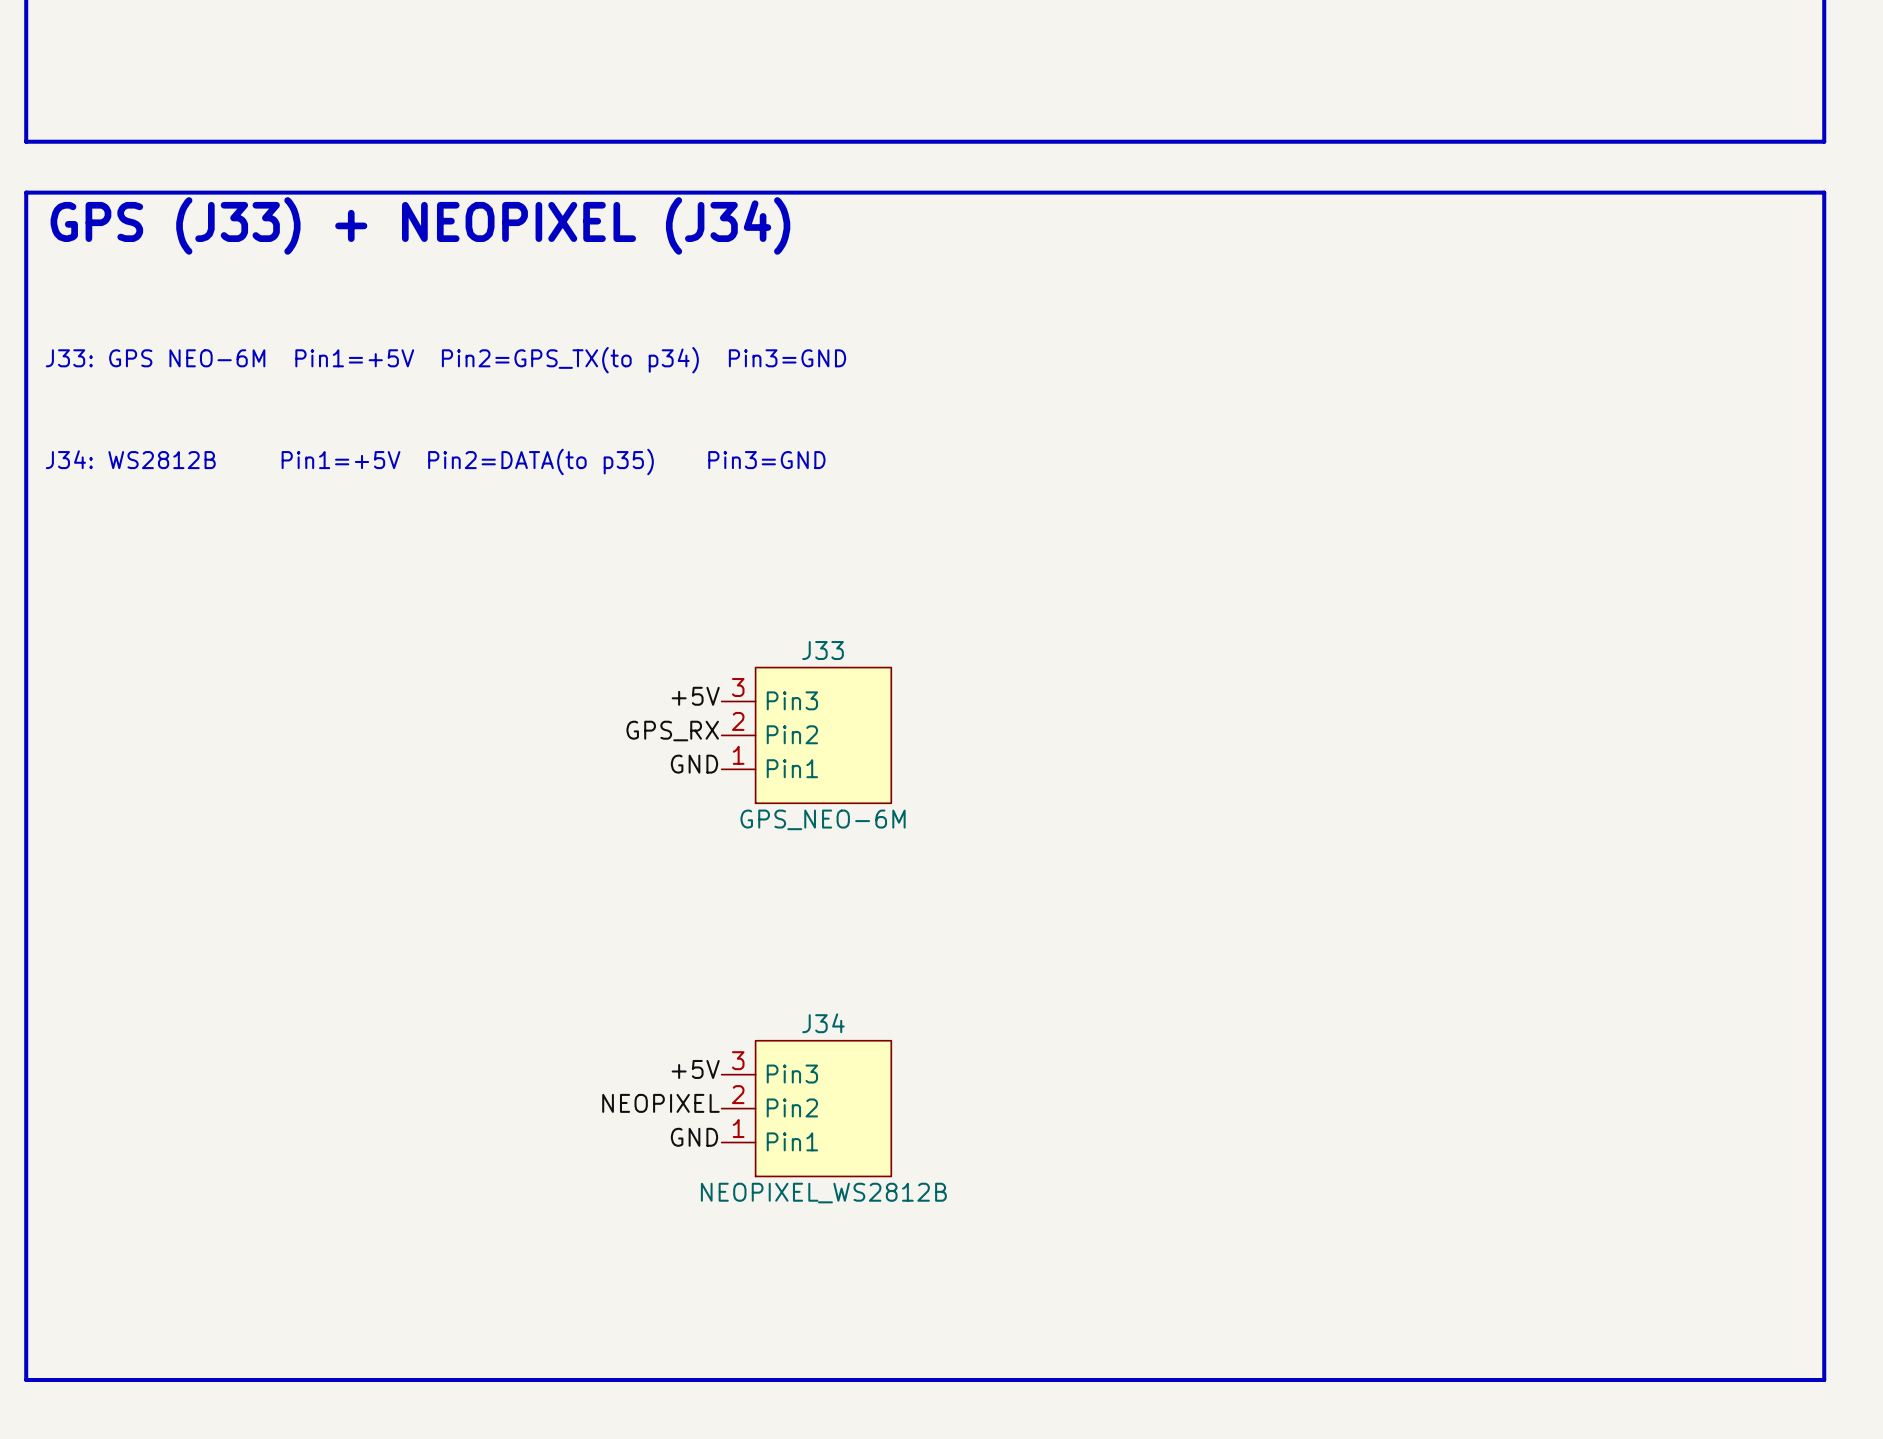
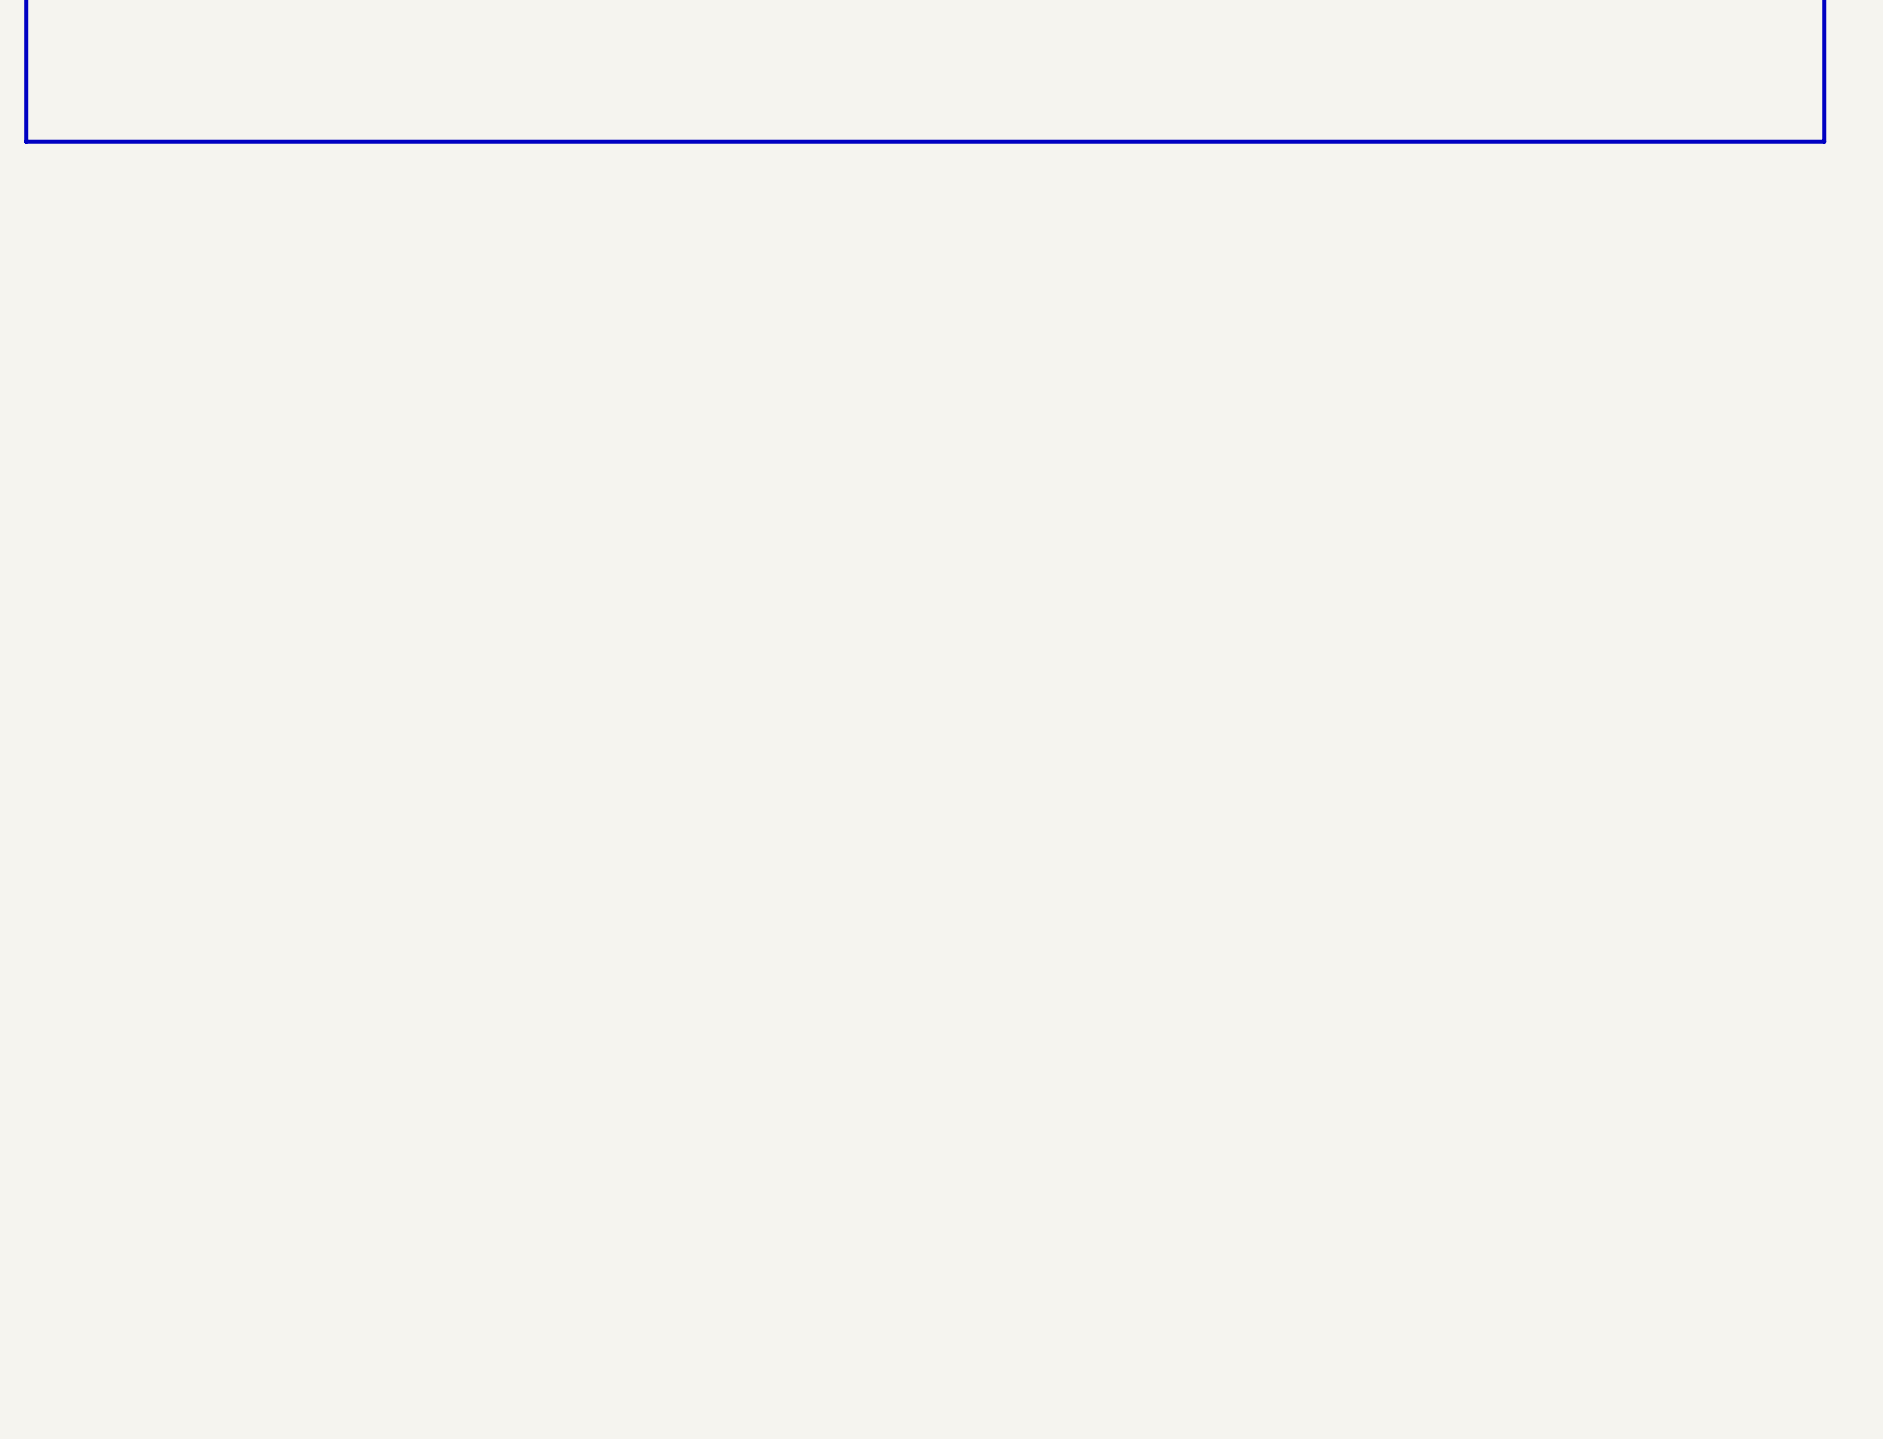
line: (26, 192) (1824, 192) (1824, 1379) (26, 1379) (26, 192) -> none
text: GPS (J33) + NEOPIXEL (J34) (420, 225) -> none
text: J33: GPS NEO-6M Pin1=+5V Pin2=GPS_TX(to p34) Pin3=GND (445, 360) -> none
text: J34: WS2812B Pin1=+5V Pin2=DATA(to p35) Pin3=GND (435, 461) -> none
label: +5V (695, 696) -> none
label: GPS_RX (672, 731) -> none
J33: GPS_NEO-6M (806, 735) -> none
label: GND (694, 764) -> none
label: +5V (695, 1069) -> none
label: NEOPIXEL (660, 1103) -> none
J34: NEOPIXEL_WS2812B (806, 1108) -> none
label: GND (694, 1137) -> none

